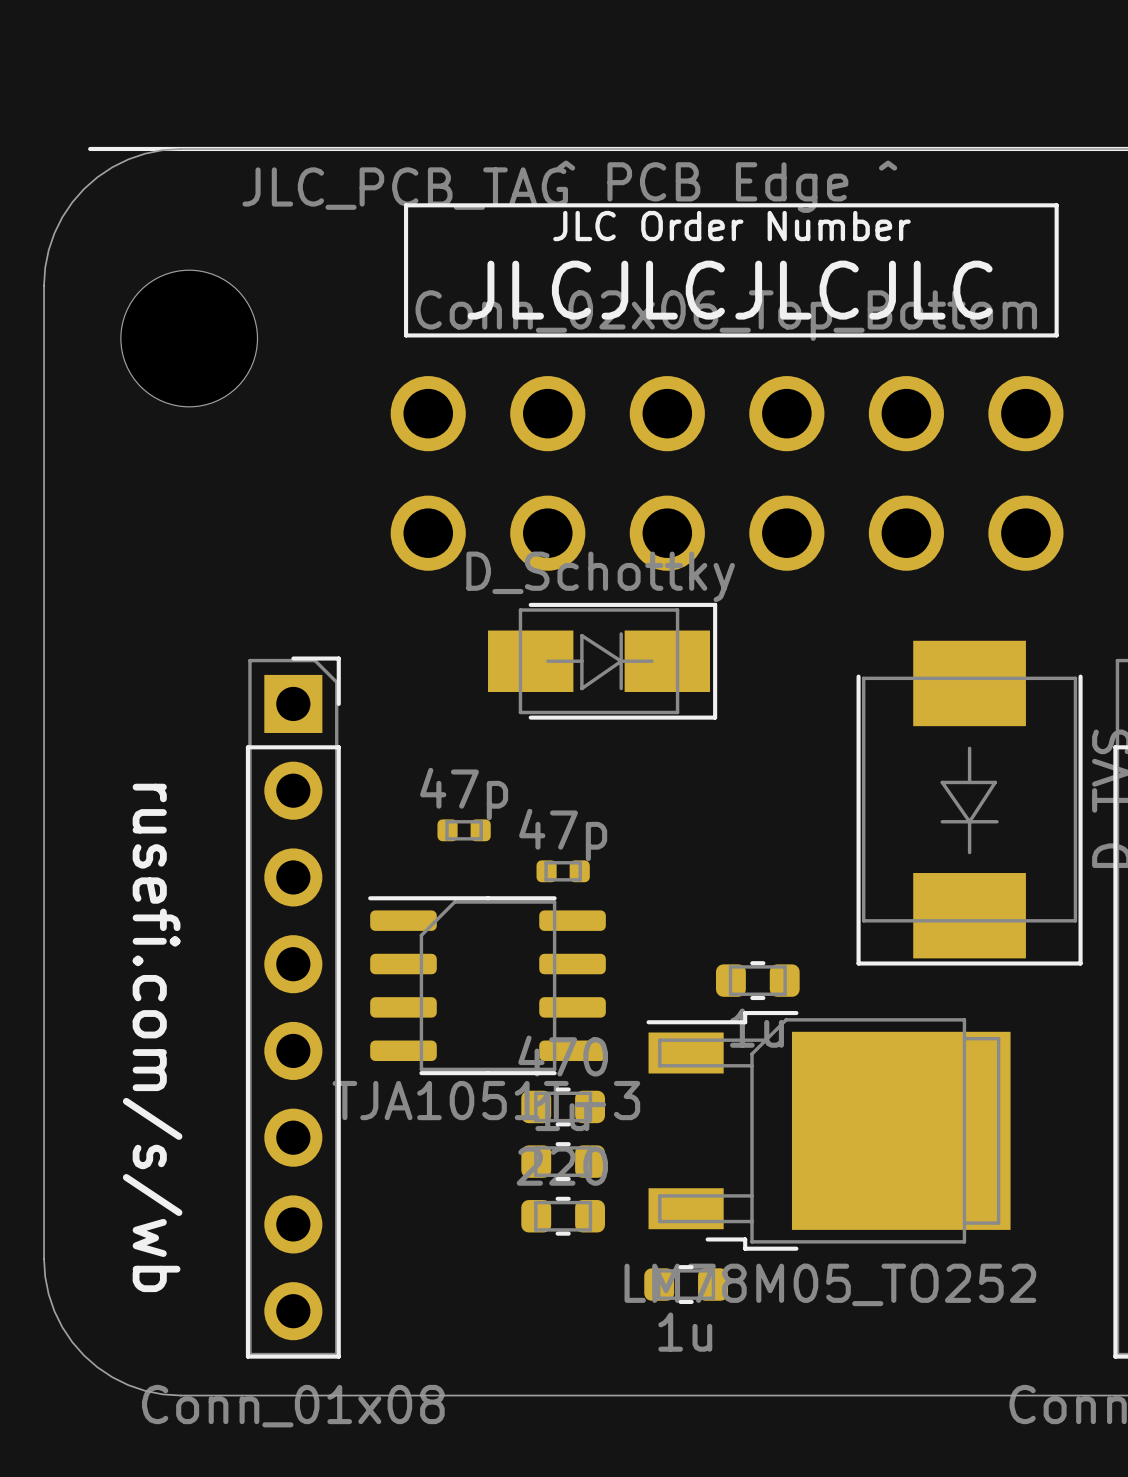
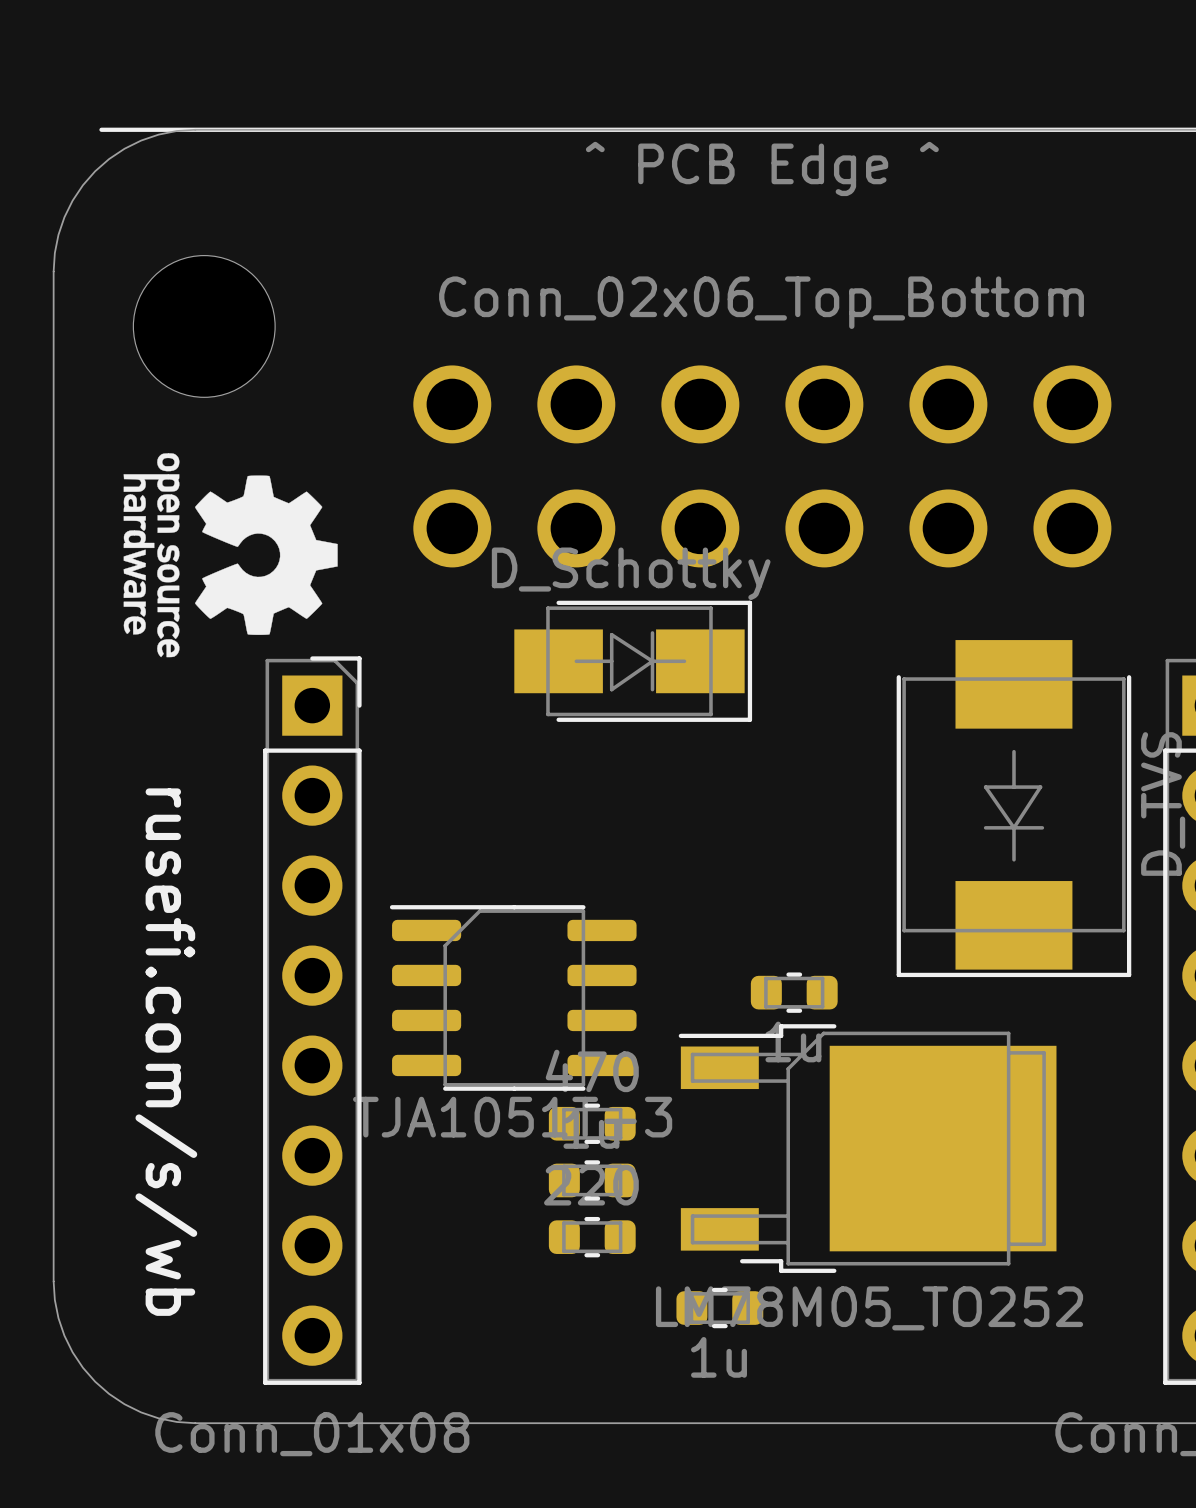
drawing: [404, 203, 1059, 338] -> none
drawing: none -> [123, 453, 338, 658]
part: 47p (464, 830) -> none
part: 47p (563, 871) -> none

